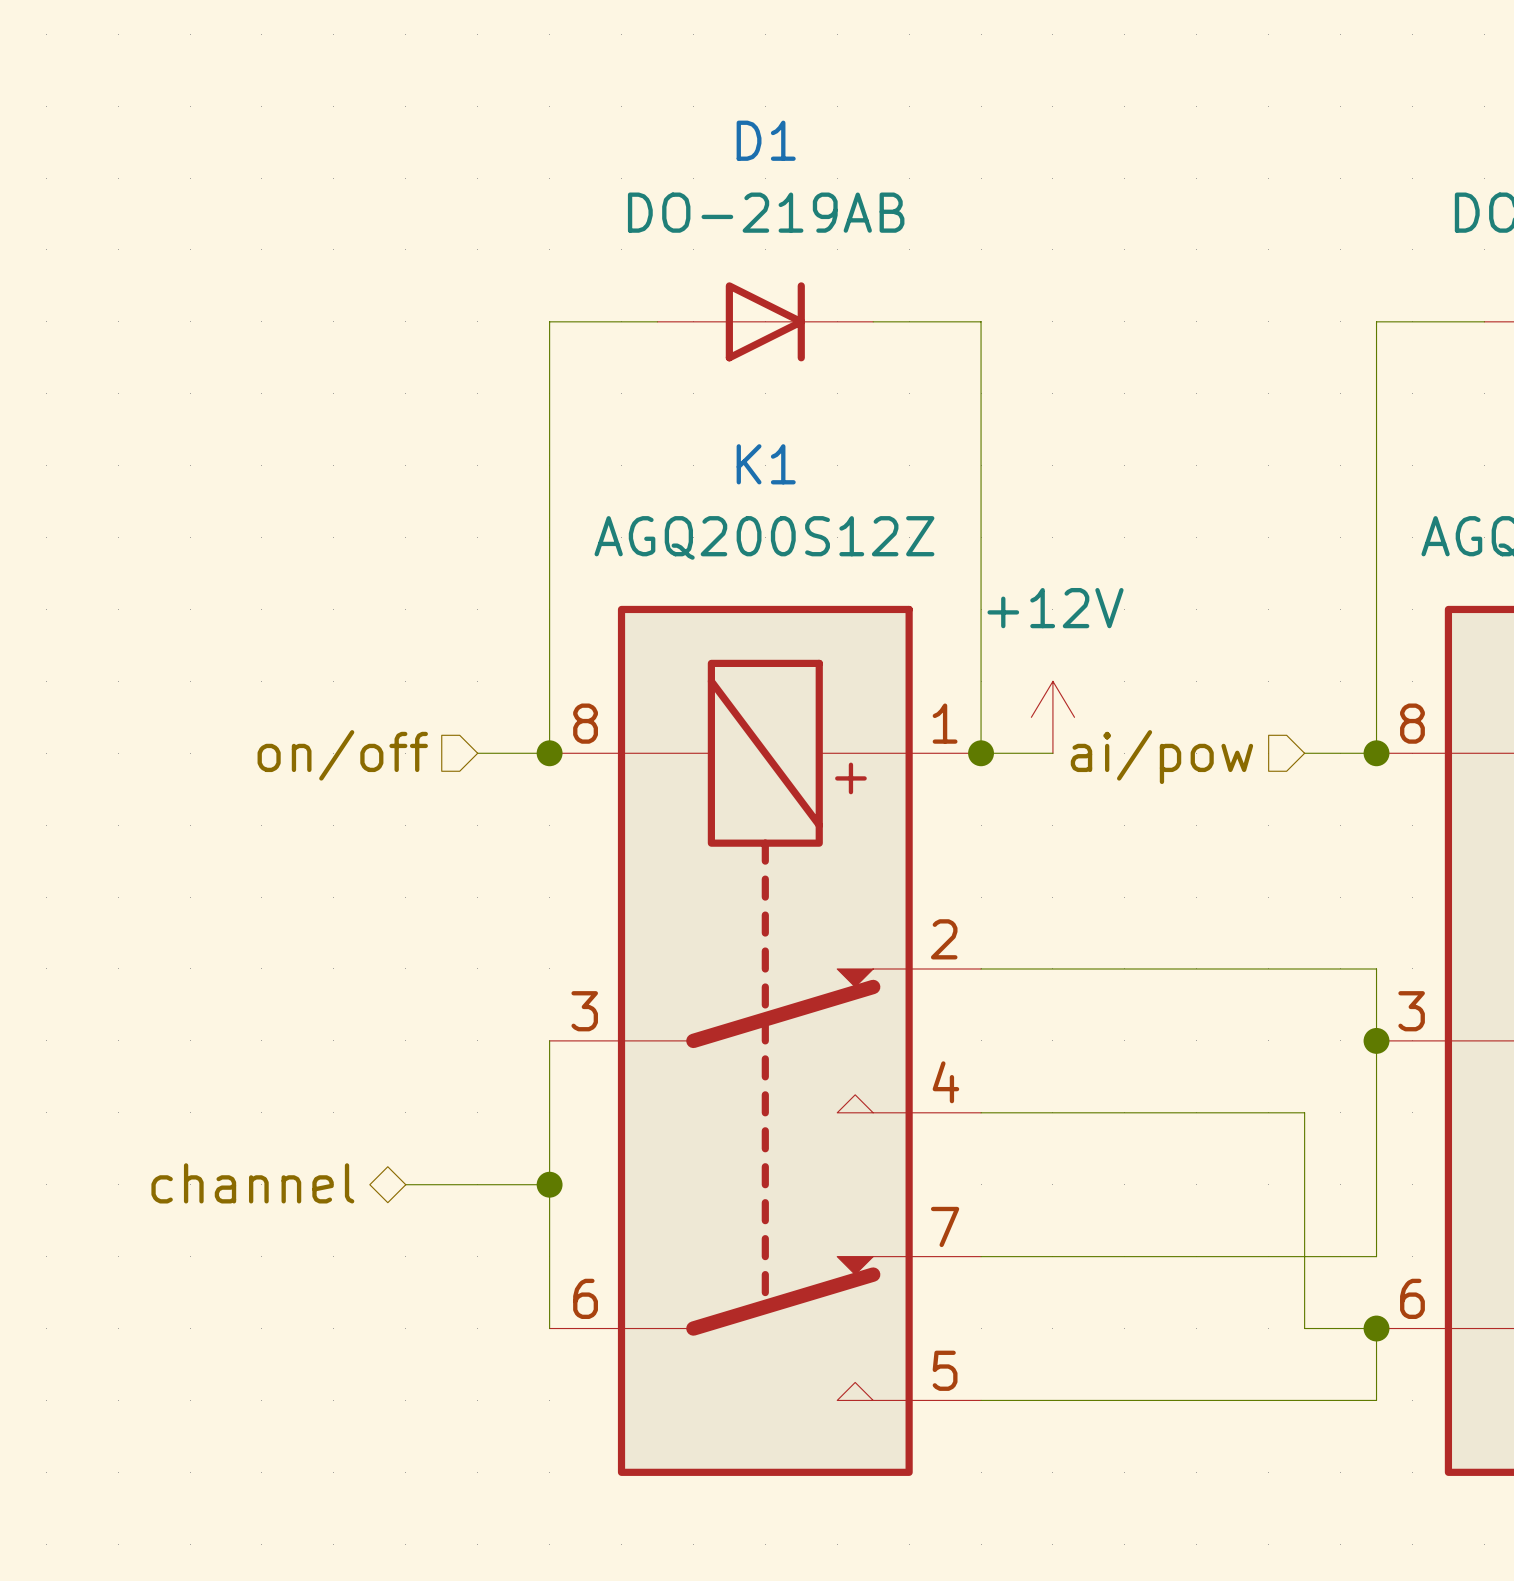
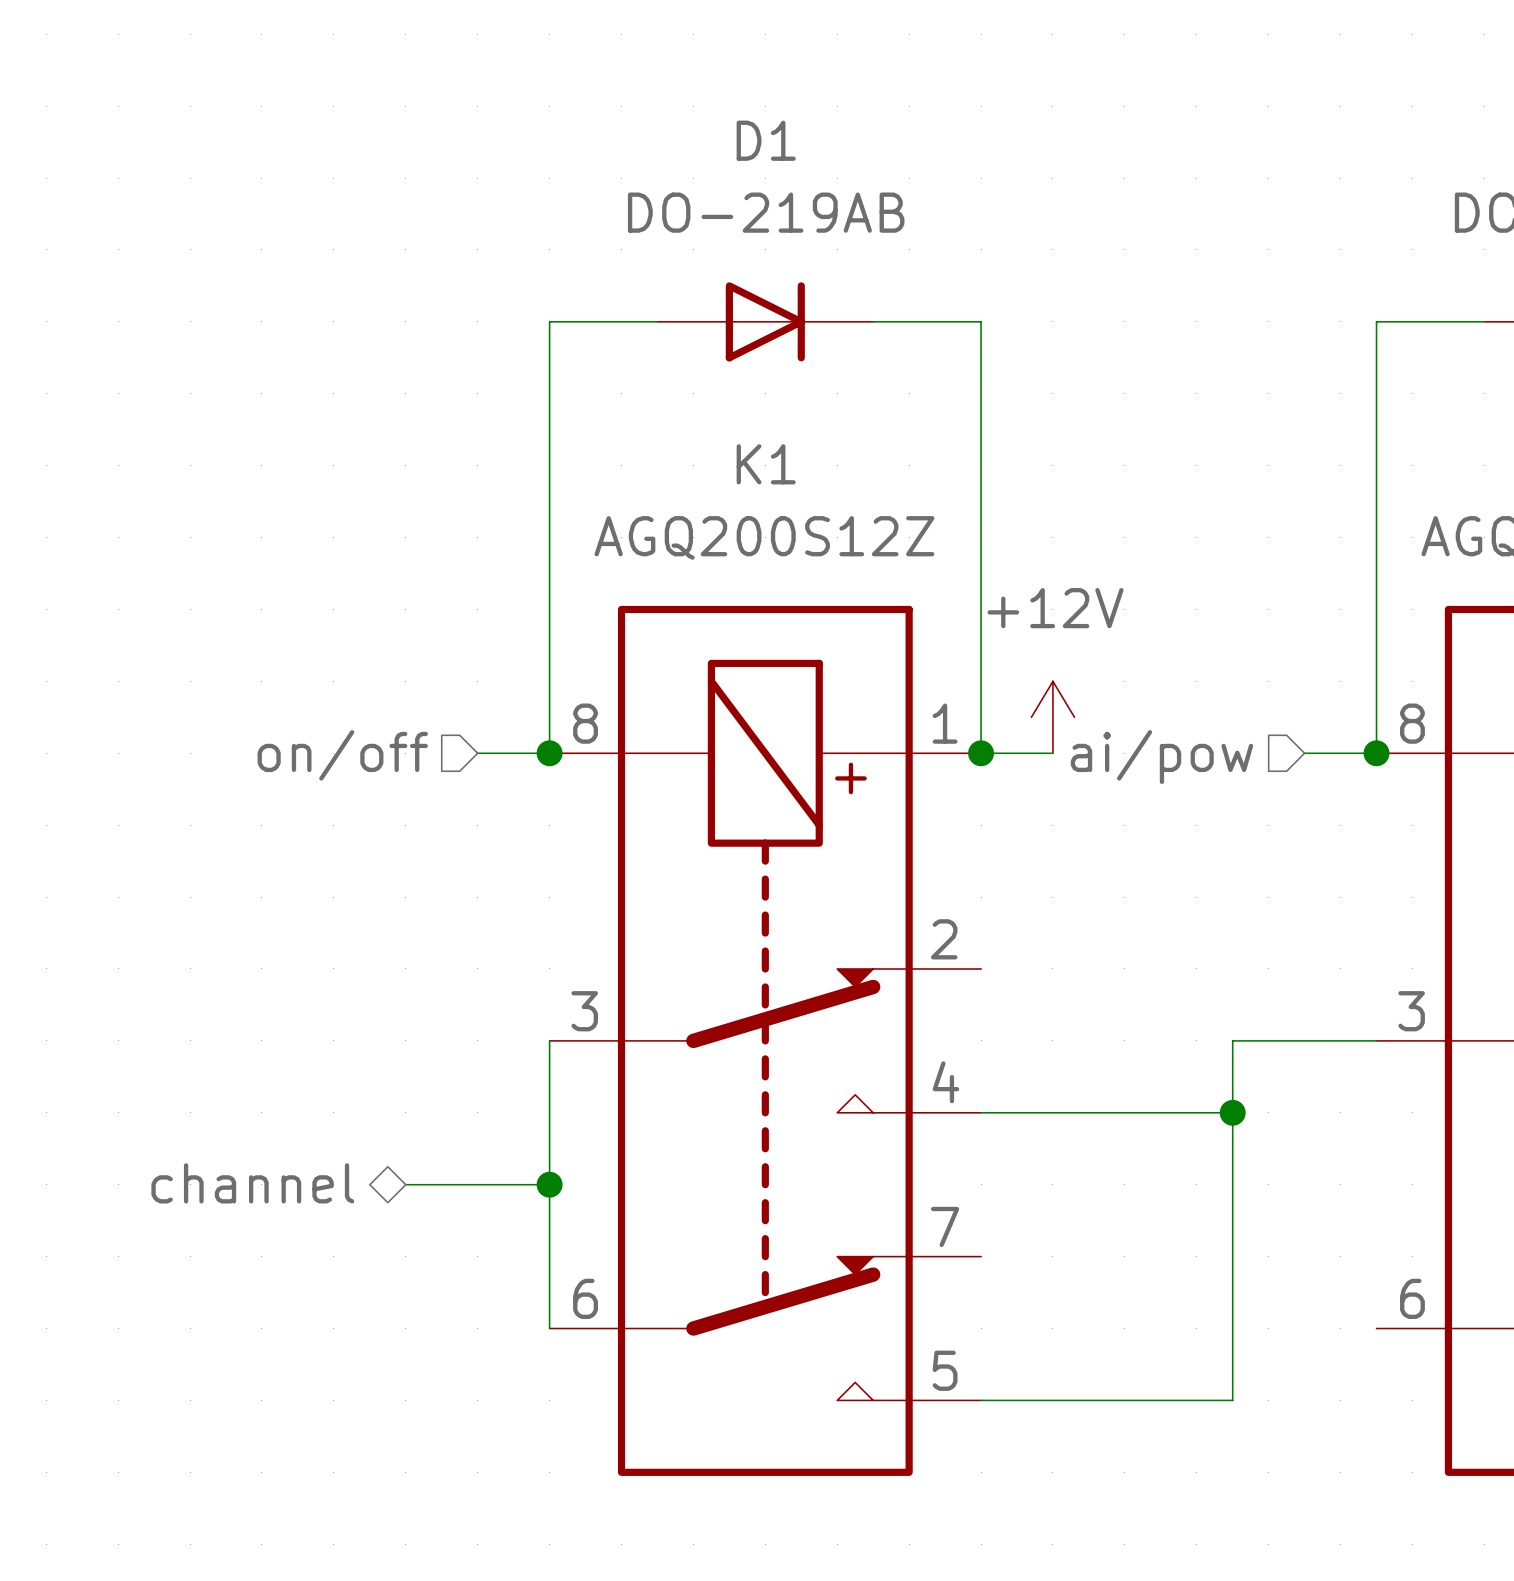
wire: (981, 968) (1376, 968) (1376, 1256) (981, 1256) -> none
junction: (1376, 1040) -> none
wire: (1232, 1112) (1304, 1112) (1304, 1328) (1376, 1328) (1376, 1400) (1232, 1400) -> (1376, 1040) (1232, 1040) (1232, 1400)
junction: none -> (1232, 1112)
junction: (1376, 1328) -> none

